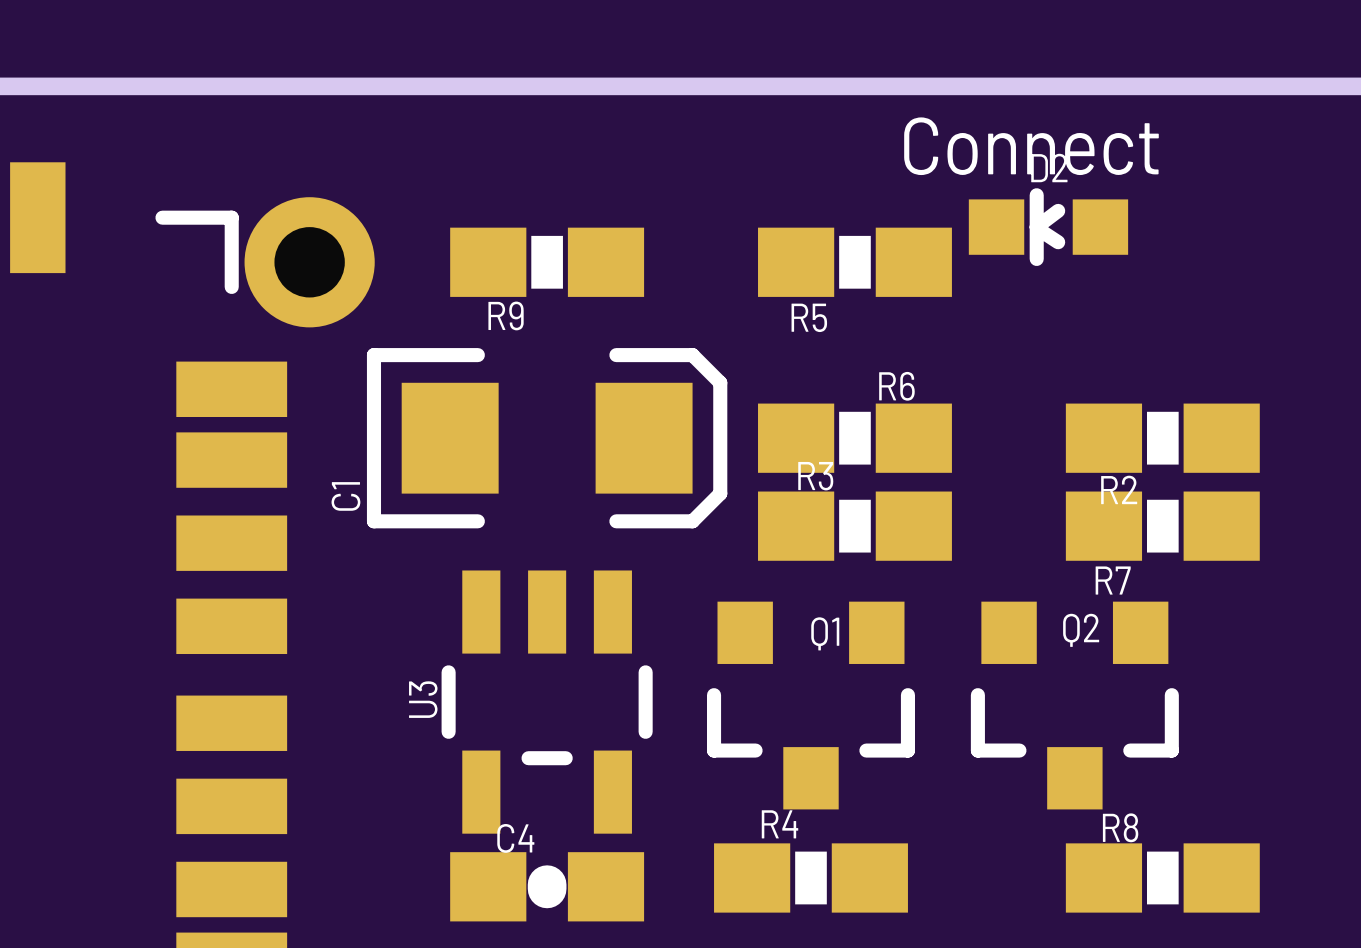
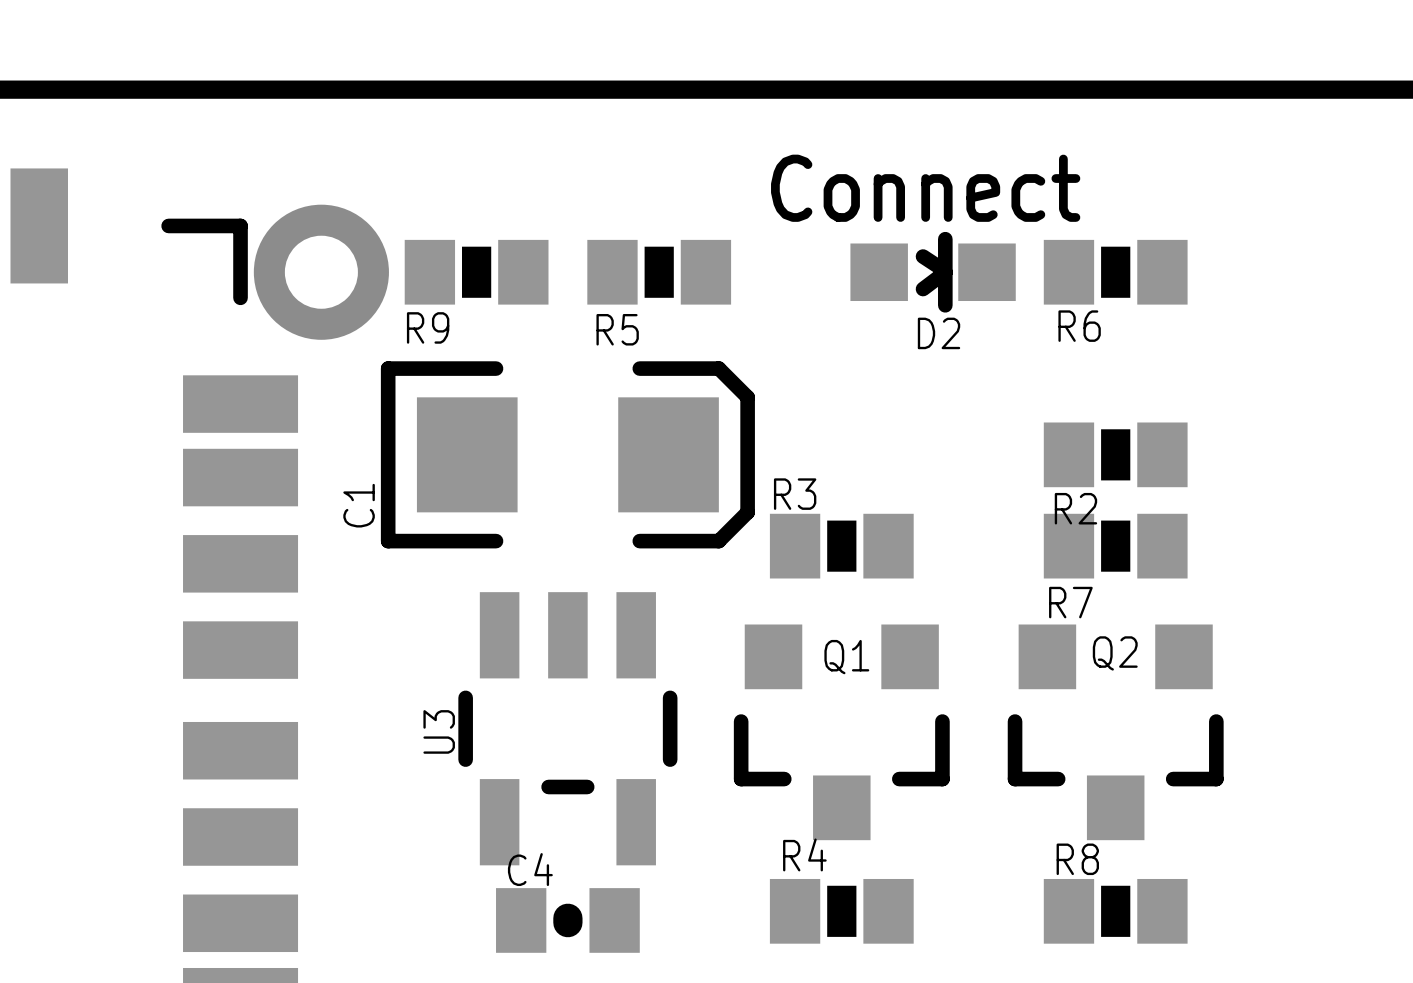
text position: Connect (1031, 146) -> Connect (925, 188)
R9 footprint: [450, 227, 645, 297] -> [404, 239, 549, 305]
R5 footprint: [758, 227, 952, 297] -> [587, 239, 732, 305]
D2 rotation: 0° (1048, 227) -> 180° (933, 272)
D2 position: (1048, 227) -> (933, 272)
R6 footprint: [758, 403, 952, 473] -> [1043, 239, 1188, 305]
R2 footprint: [1065, 403, 1260, 473] -> [1043, 422, 1188, 488]
R3 footprint: [758, 491, 952, 561] -> [769, 513, 914, 579]
R7 footprint: [1065, 491, 1260, 561] -> [1043, 513, 1188, 579]
R4 footprint: [714, 843, 908, 913] -> [769, 878, 914, 944]
R8 footprint: [1065, 843, 1260, 913] -> [1043, 878, 1188, 944]
C4 footprint: [450, 852, 645, 922] -> [496, 888, 640, 953]

